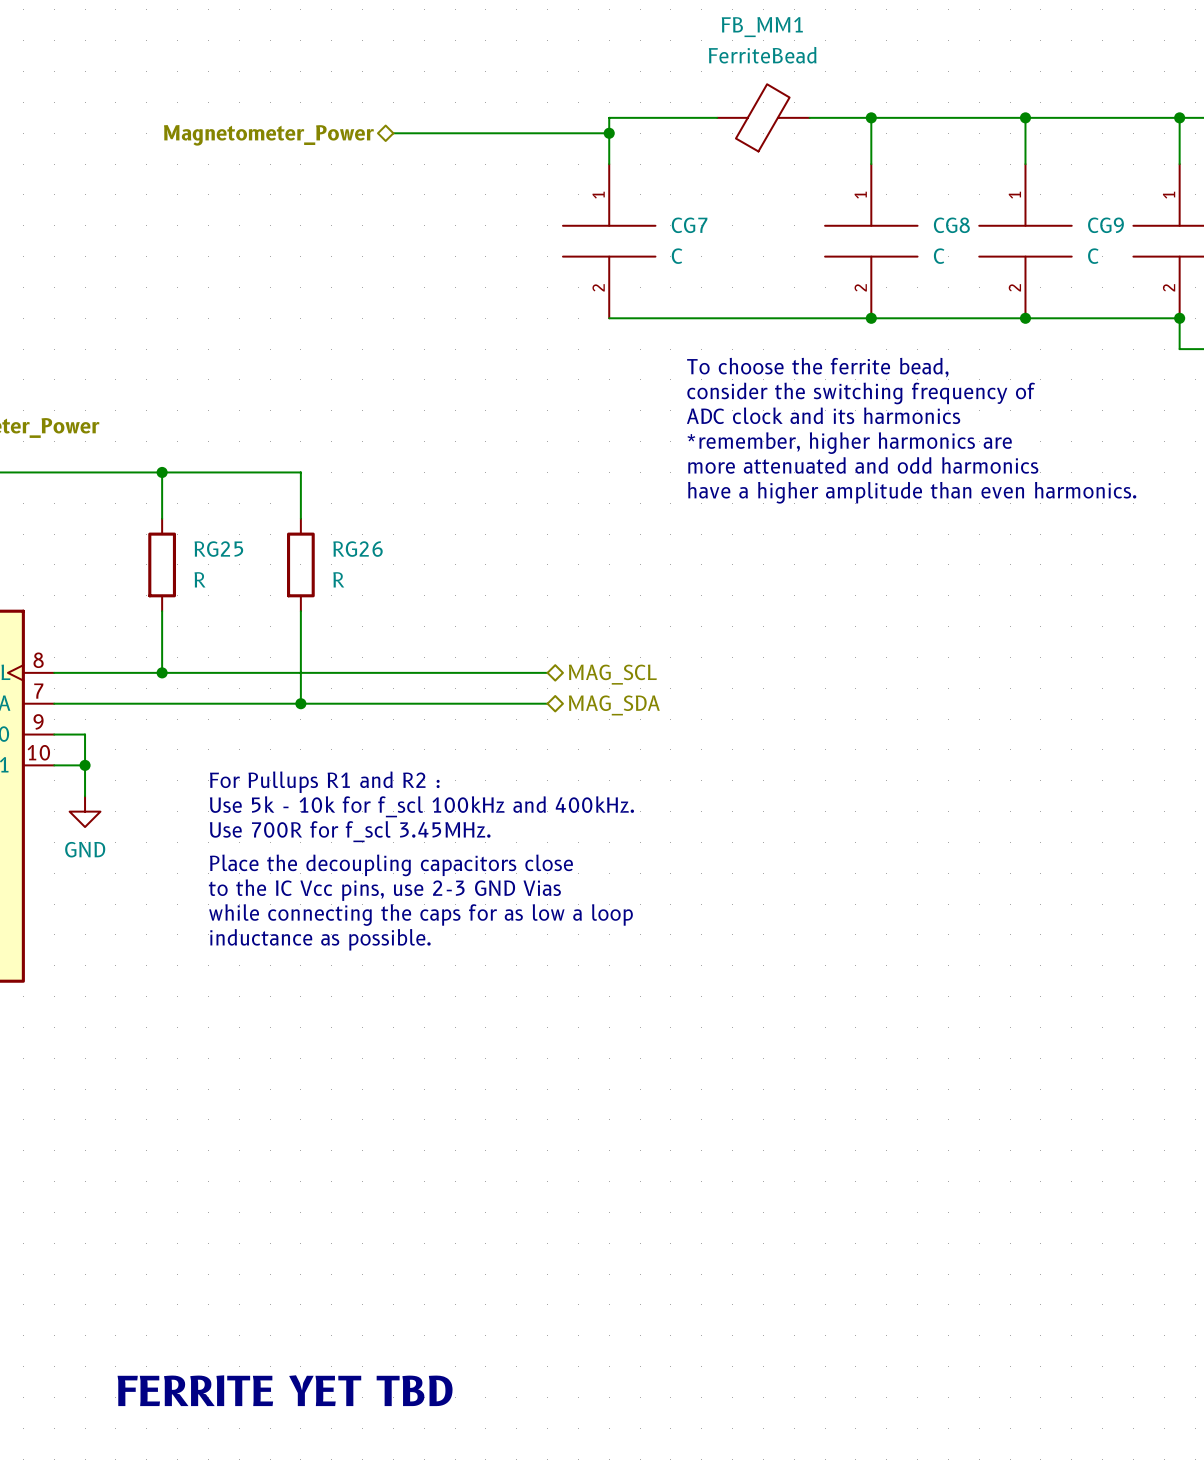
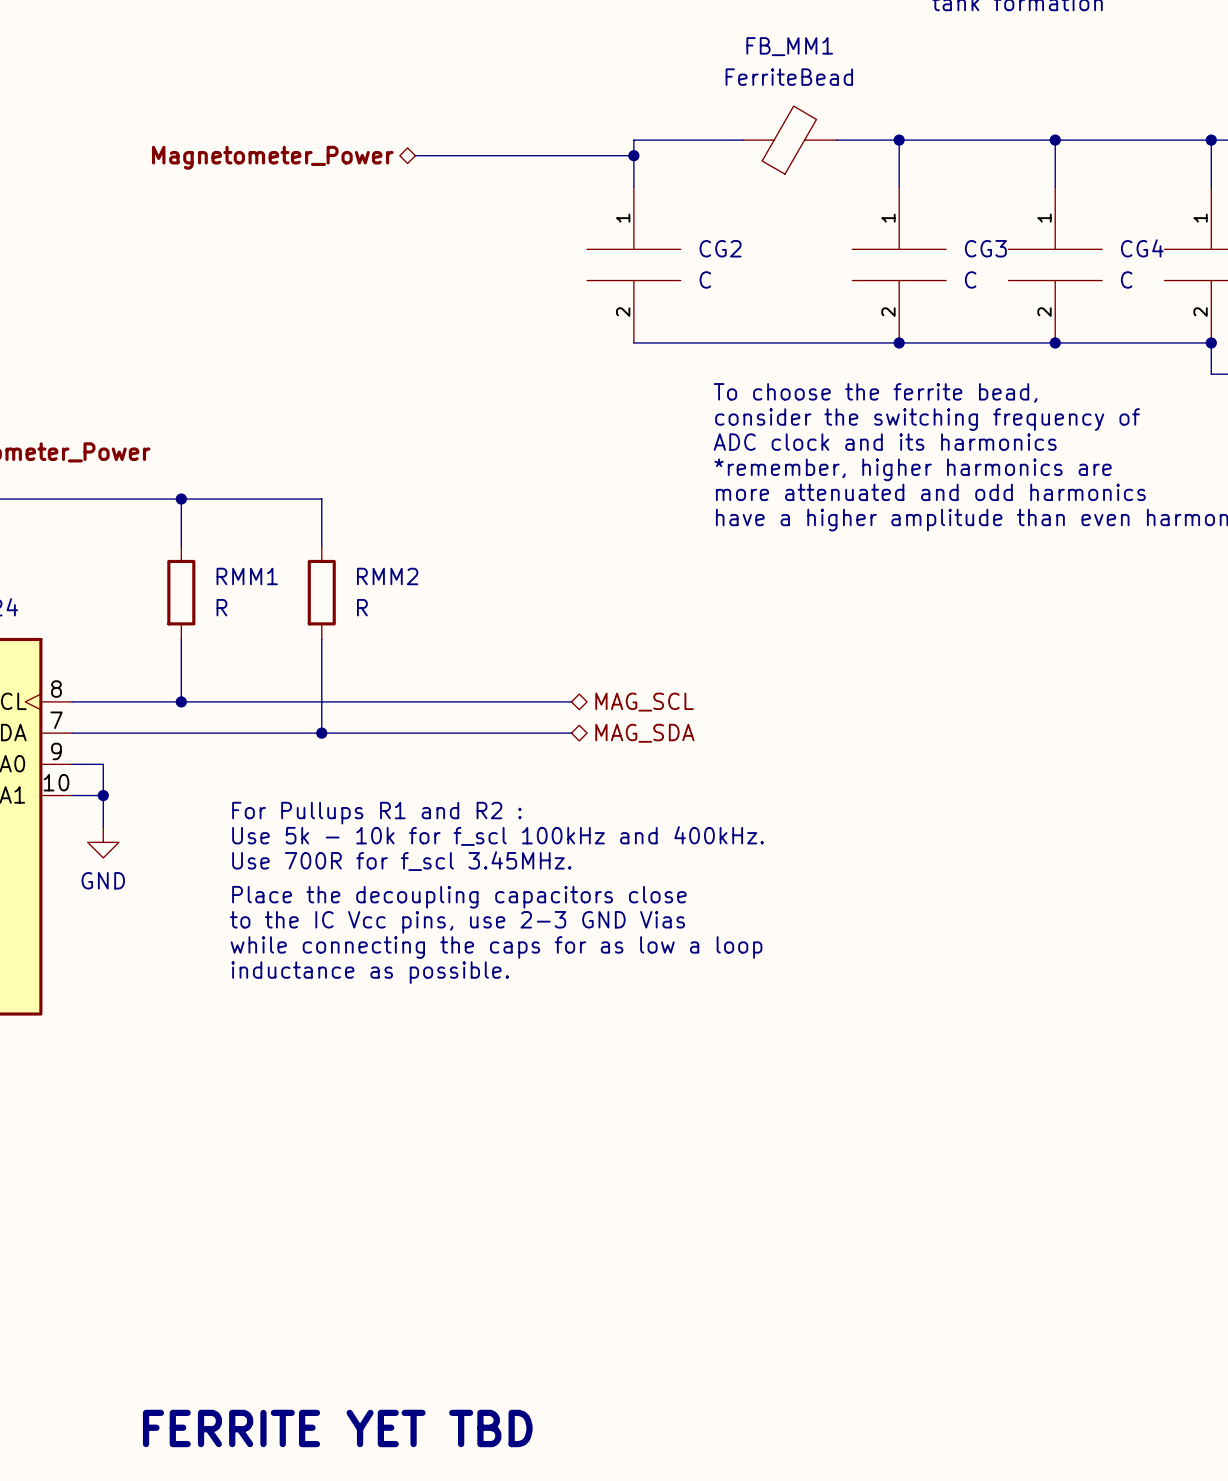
CG7 name: CG7 (689, 225) -> CG2 (720, 248)
CG8 name: CG8 (951, 225) -> CG3 (985, 248)
CG9 name: CG9 (1105, 225) -> CG4 (1142, 248)
RG25 name: RG25 (218, 549) -> RMM1 (247, 576)
RG26 name: RG26 (357, 549) -> RMM2 (387, 576)

